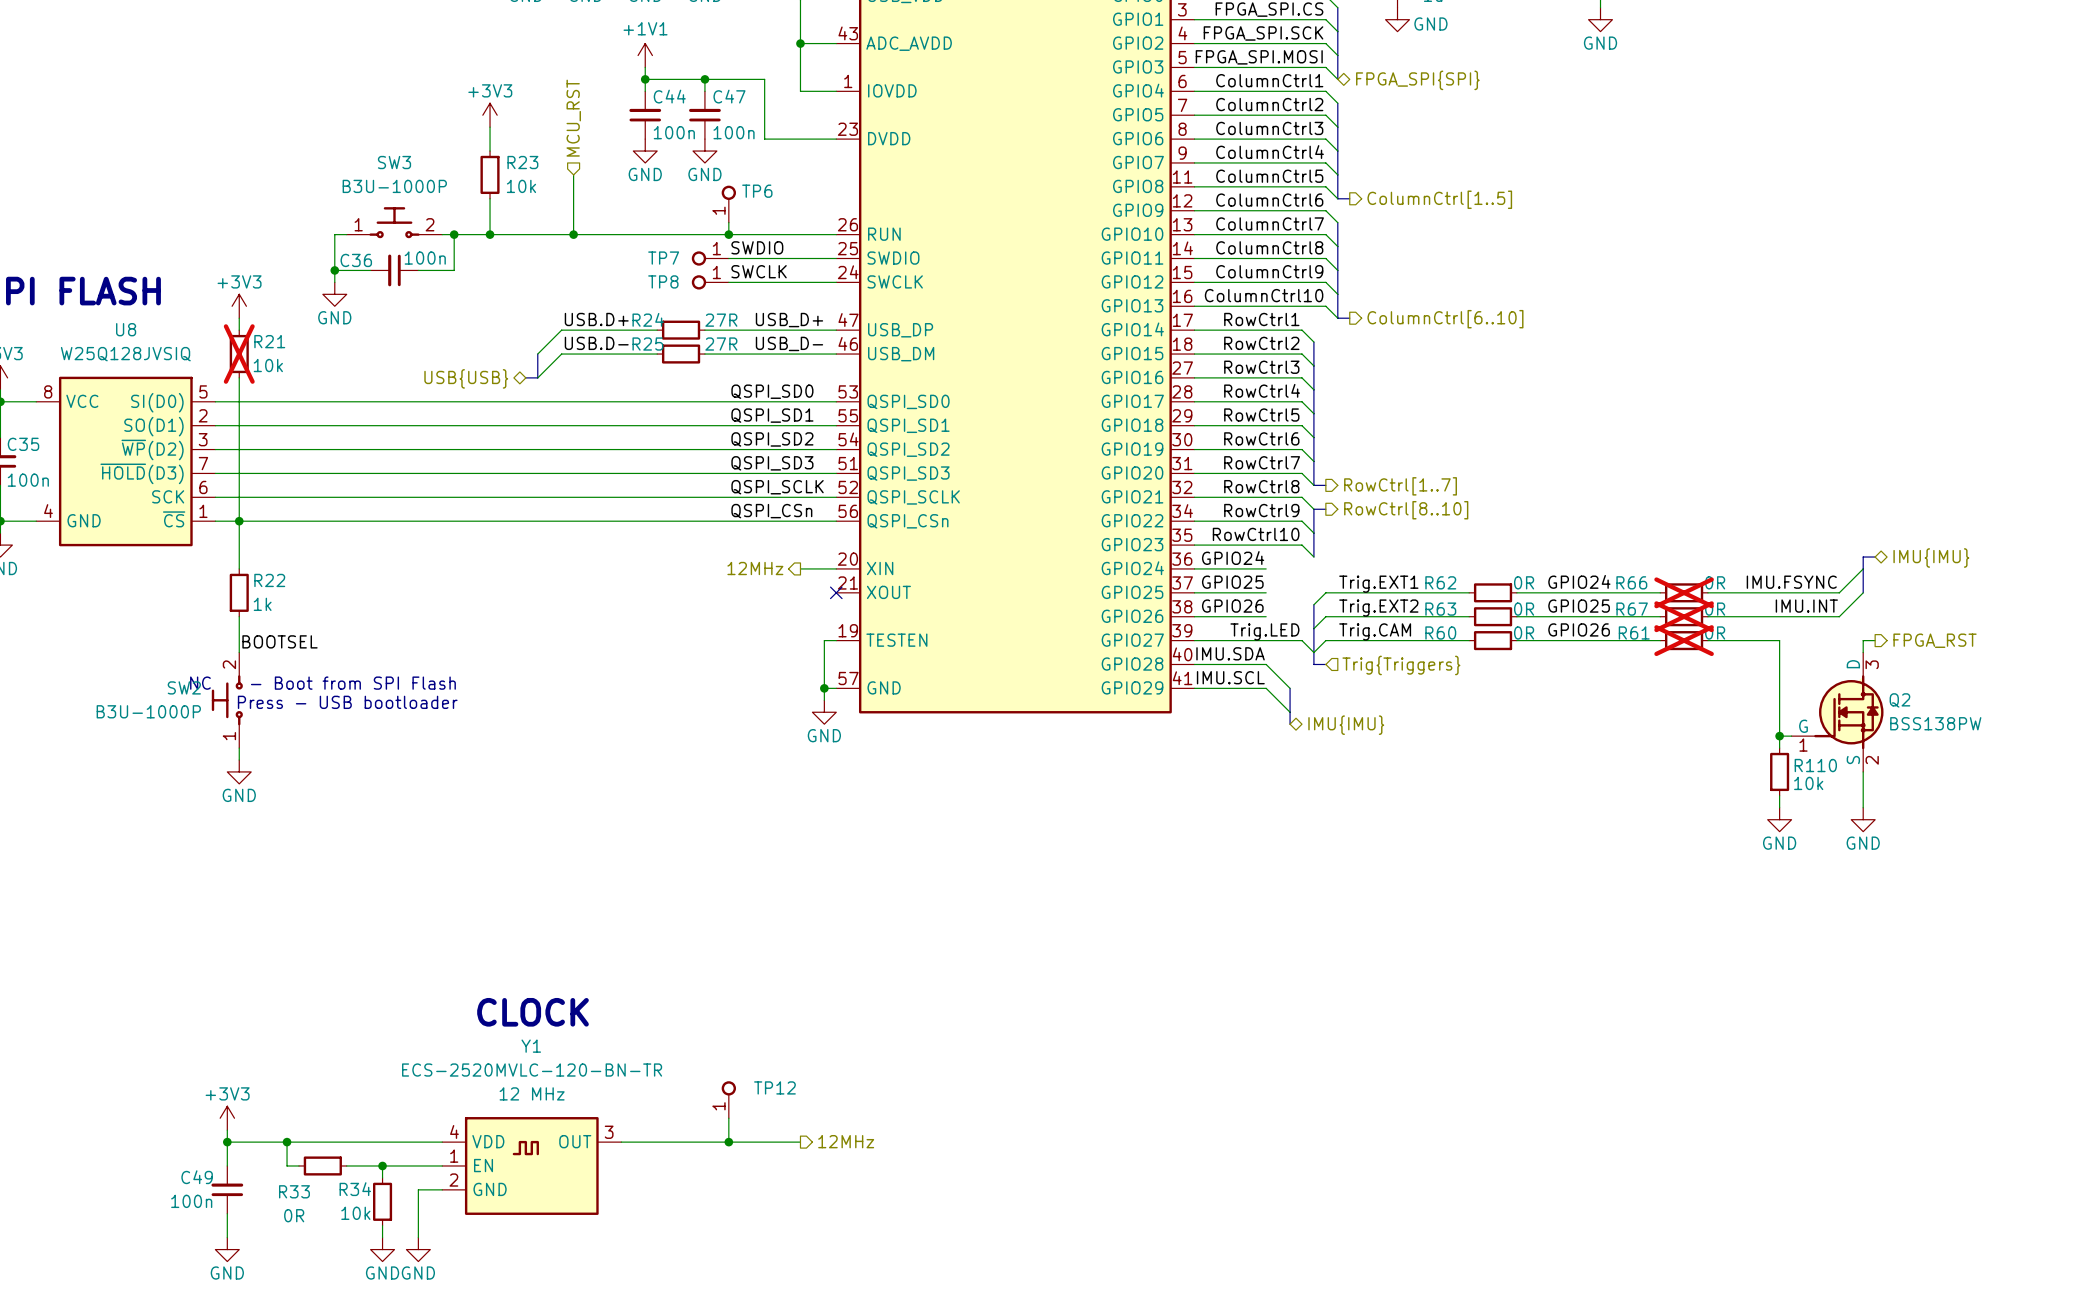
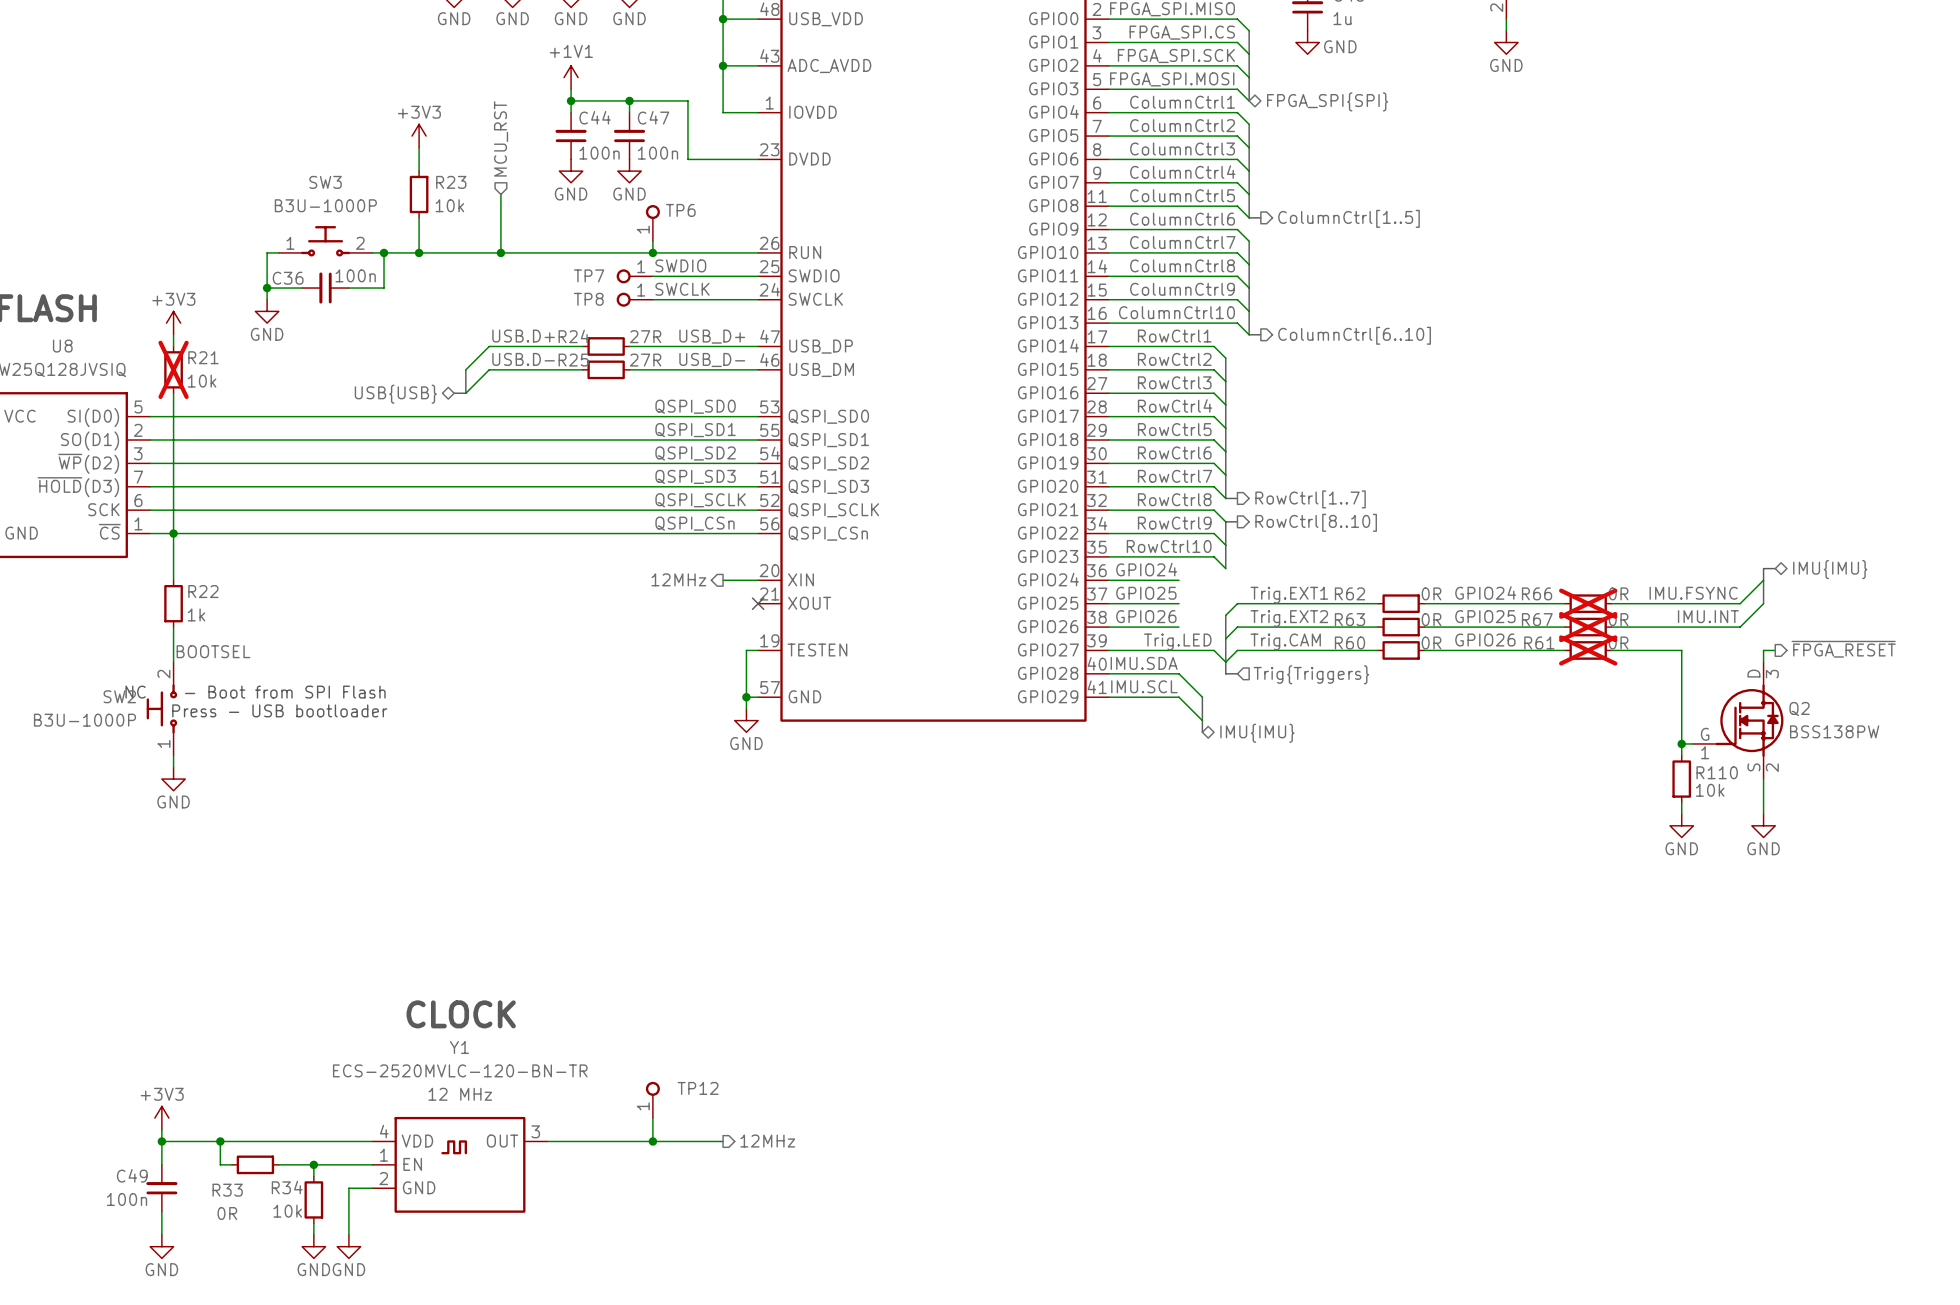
hierarchical label: FPGA_RST (1935, 640) -> ~{FPGA_RESET} (1843, 649)

